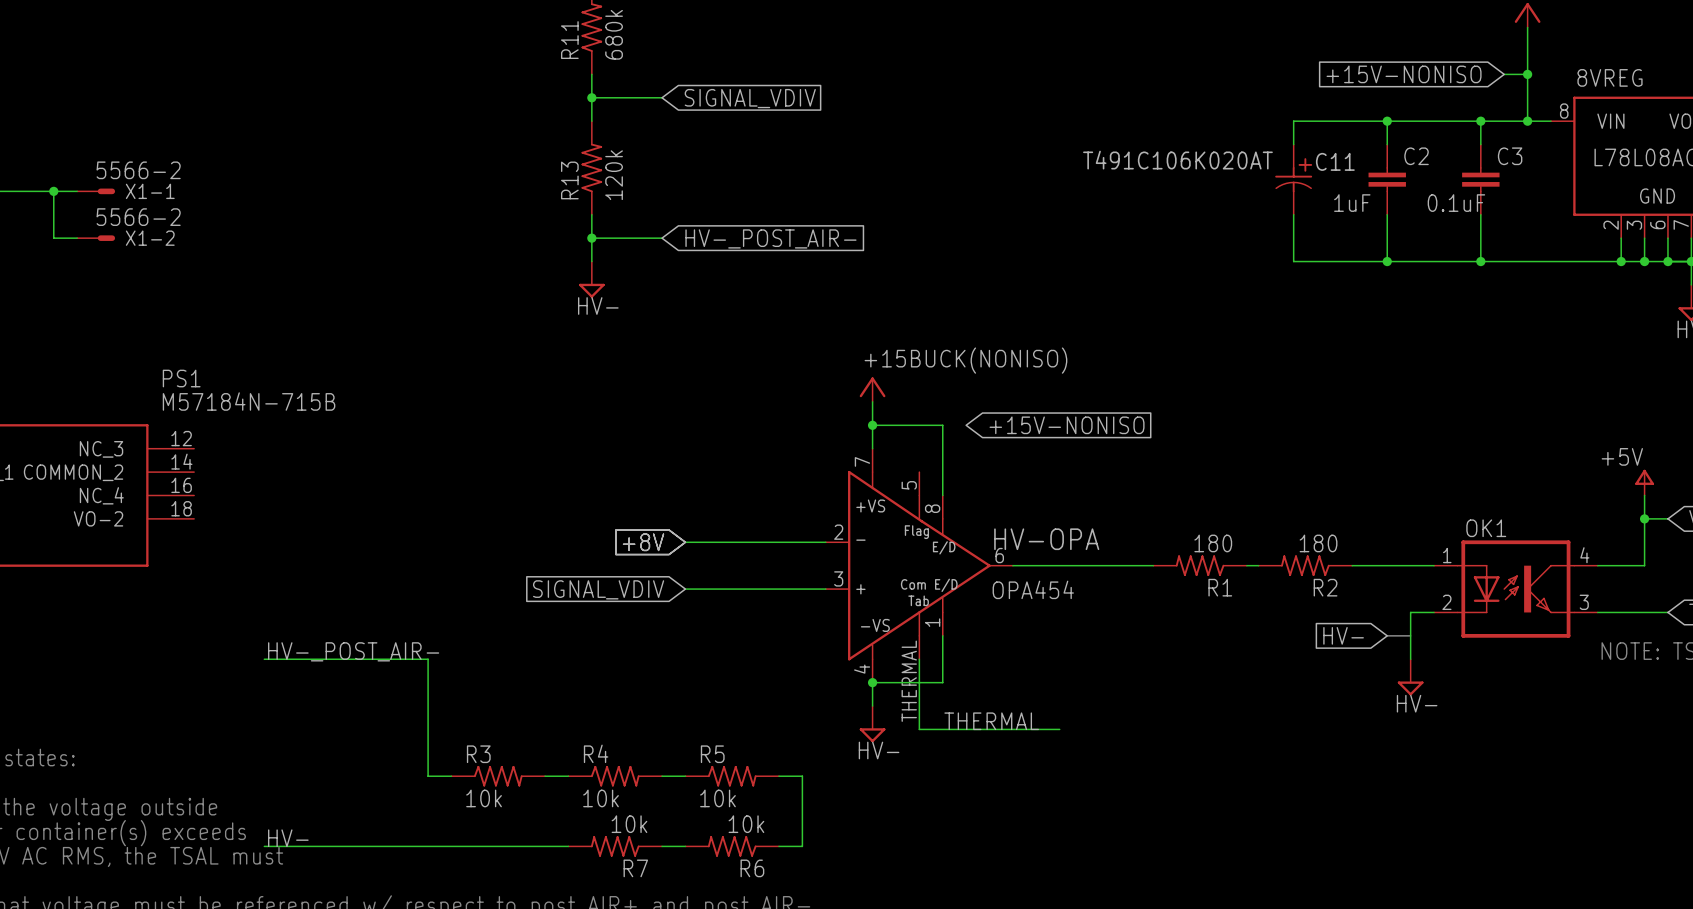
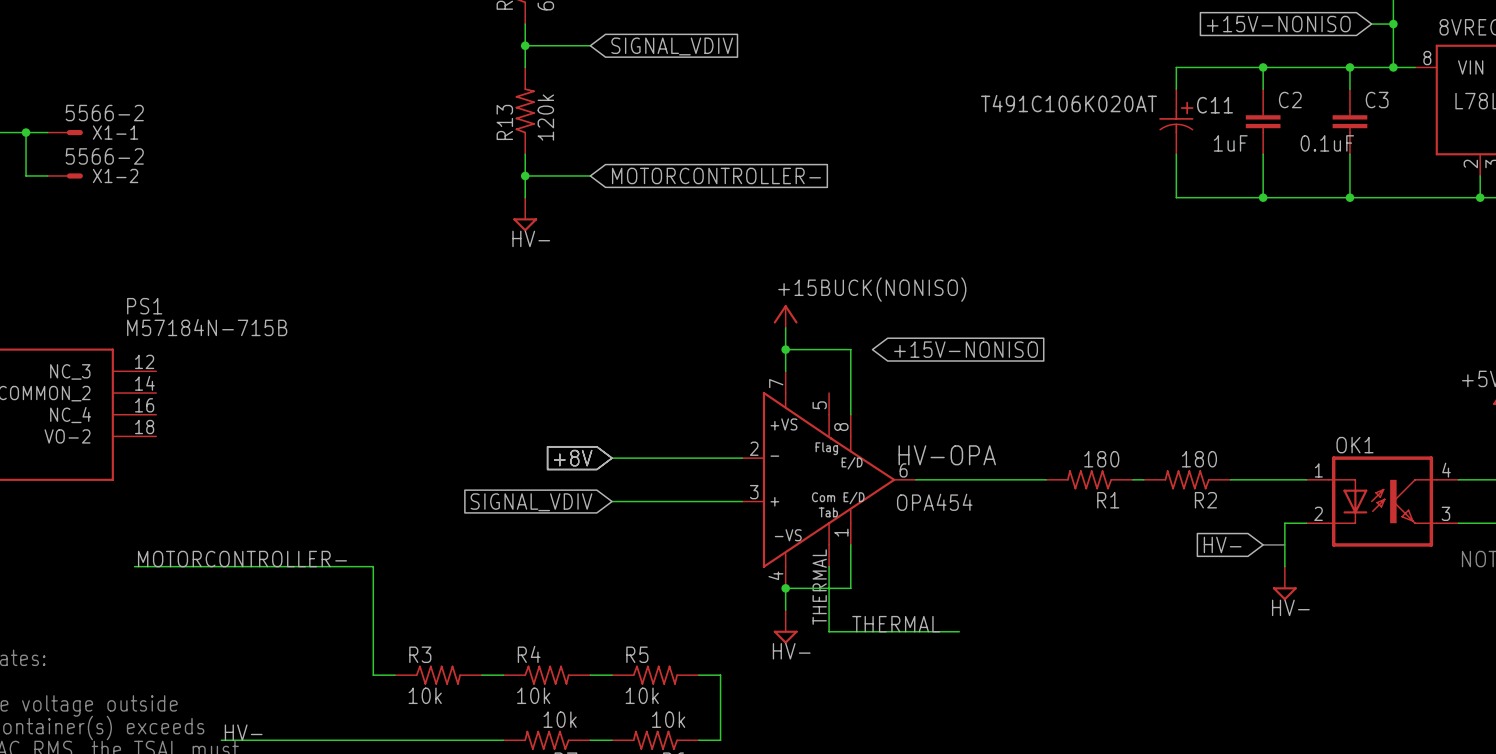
global label: HV-_POST_AIR- (770, 238) -> MOTORCONTROLLER- (716, 175)
label: none -> MOTORCONTROLLER- (242, 559)
label: HV-_POST_AIR- (353, 651) -> none
wire: none -> (134, 566) (221, 566)

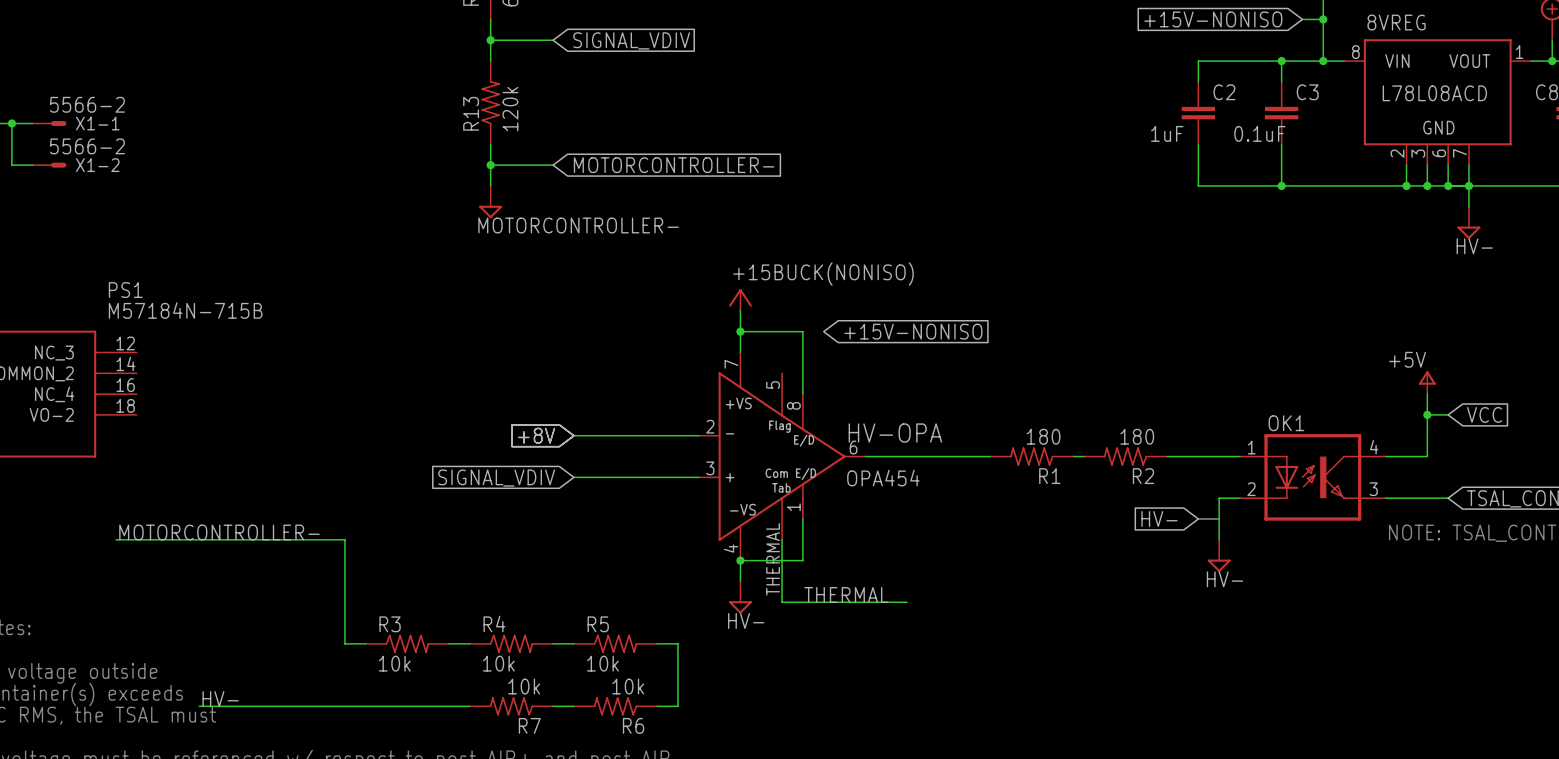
wire: (1263, 67) (1176, 67) (1176, 89) -> none
junction: (1263, 67) -> none
C11: T491C106K020AT (1176, 121) -> none
wire: (1176, 154) (1176, 197) (1263, 197) -> none
junction: (1263, 197) -> none
power symbol: HV- (525, 214) -> MOTORCONTROLLER- (490, 202)

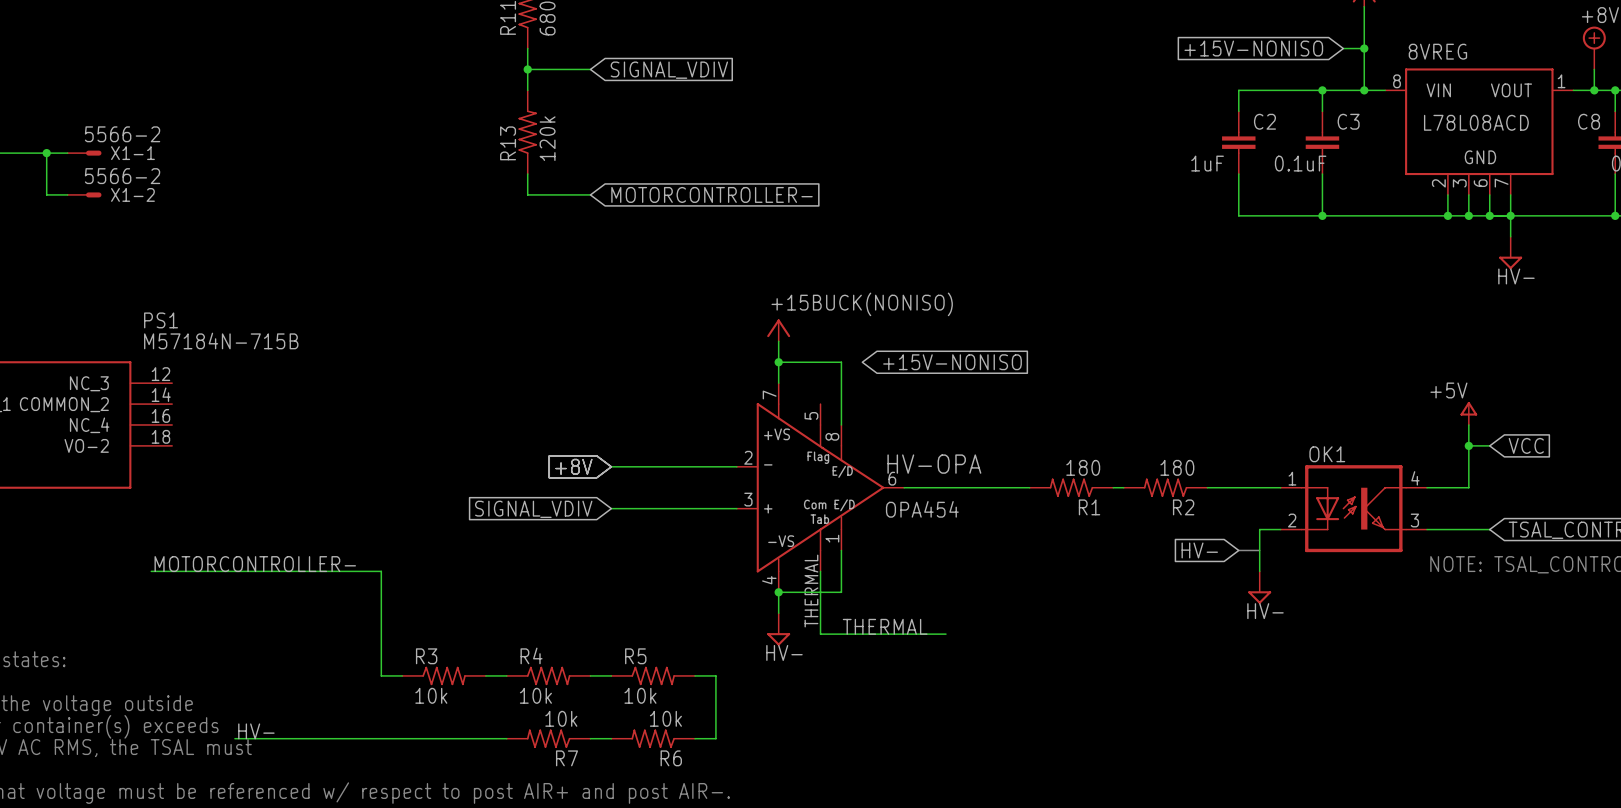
wire: (490, 165) (490, 185) -> none
junction: (490, 165) -> none
power symbol: MOTORCONTROLLER- (490, 202) -> none

